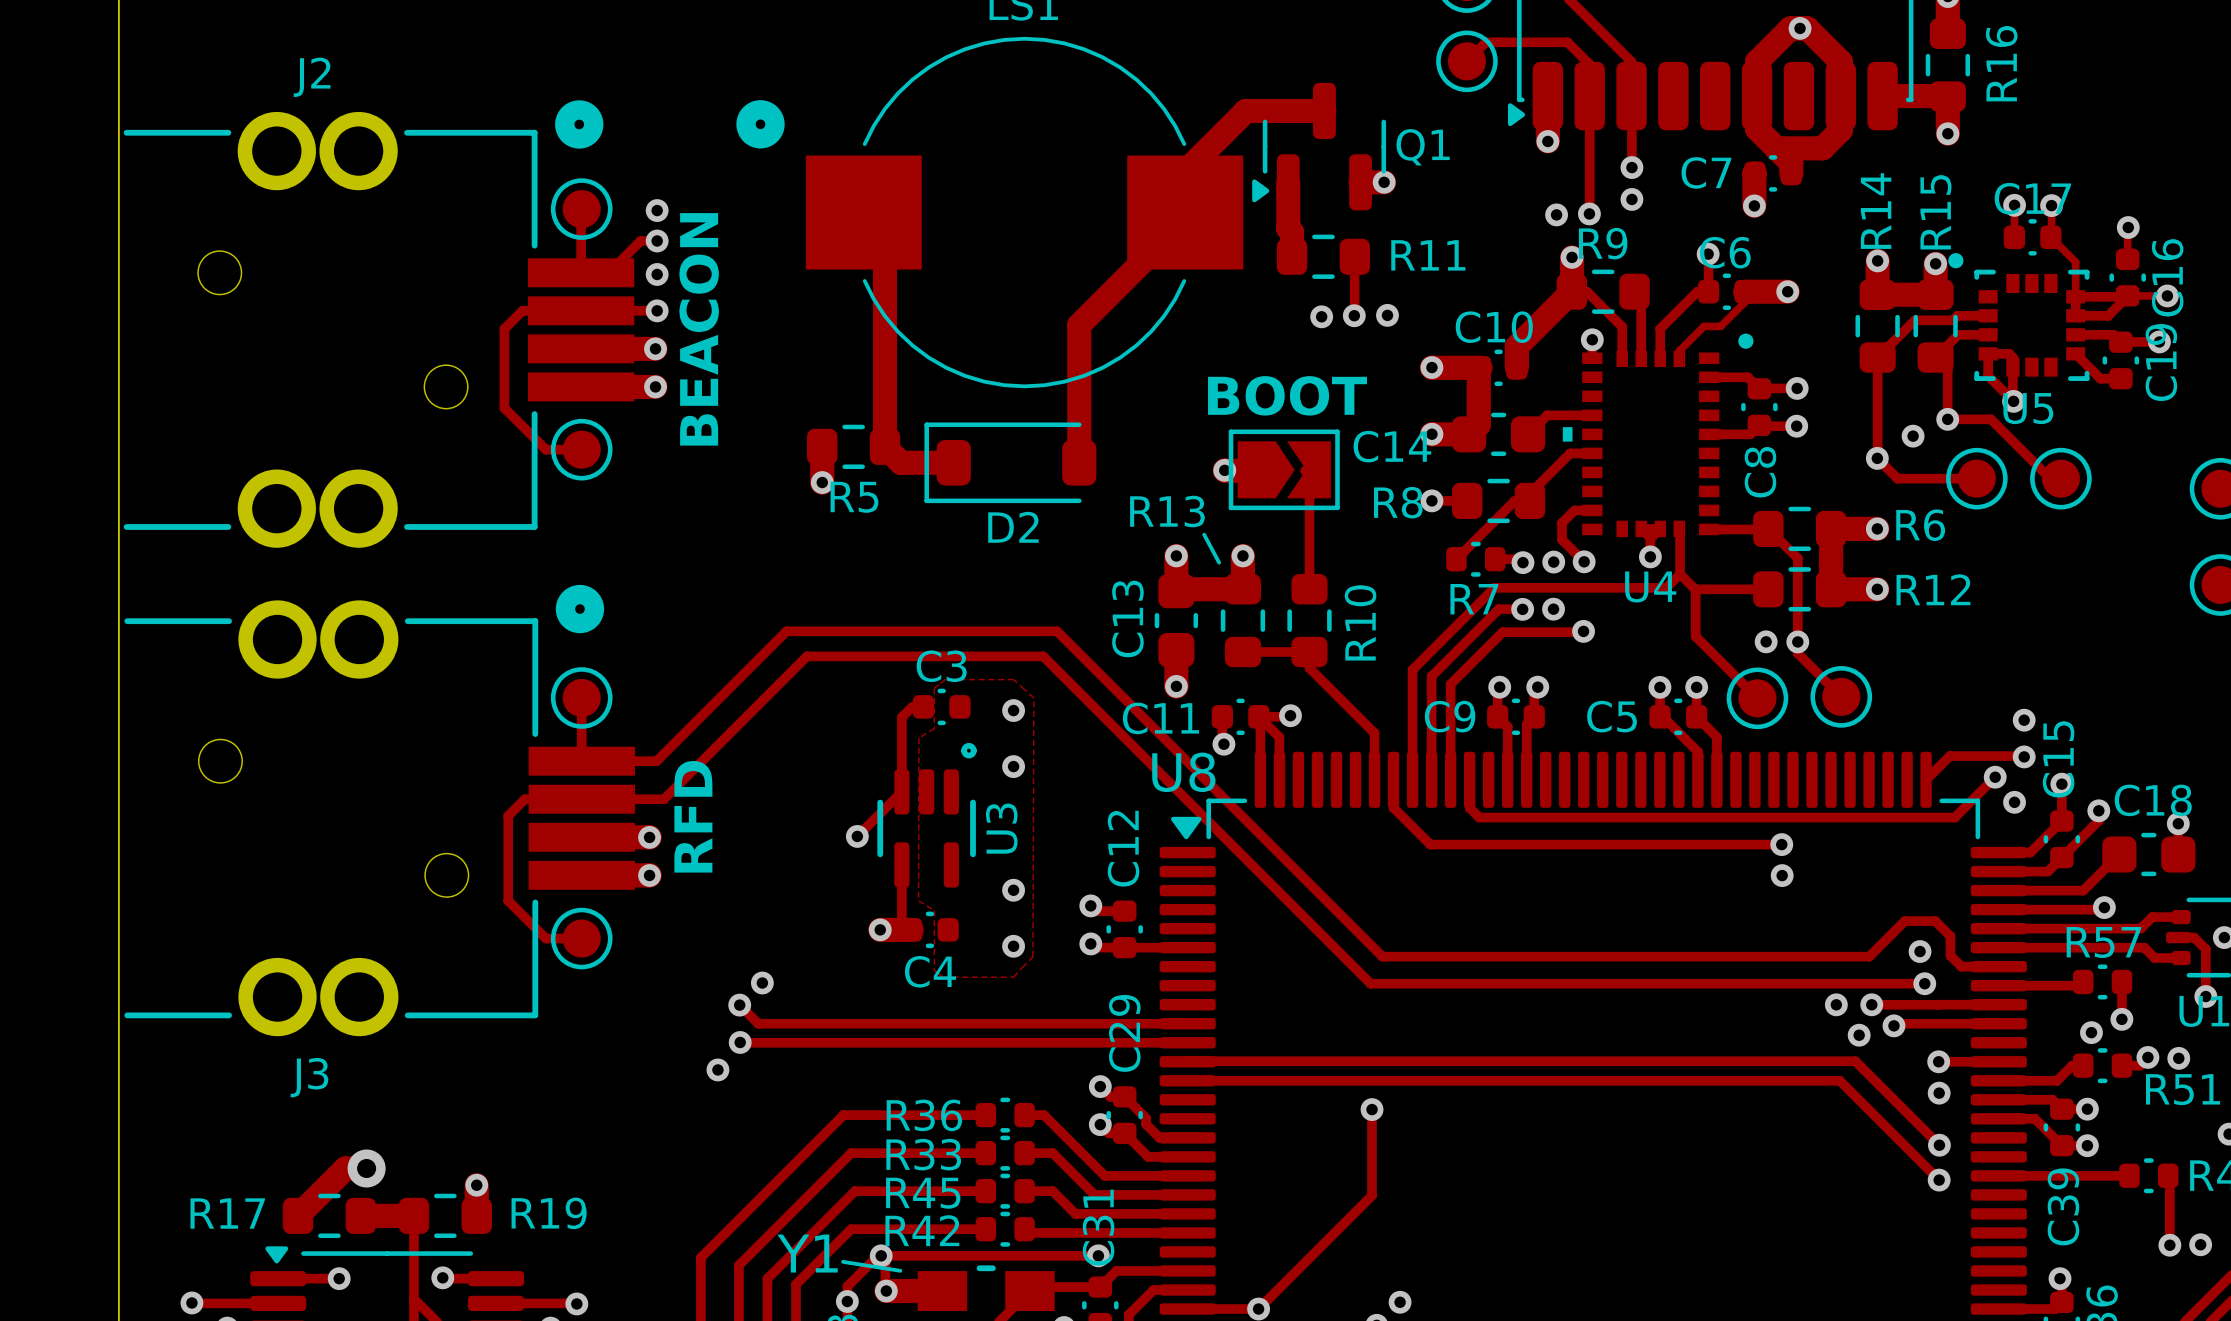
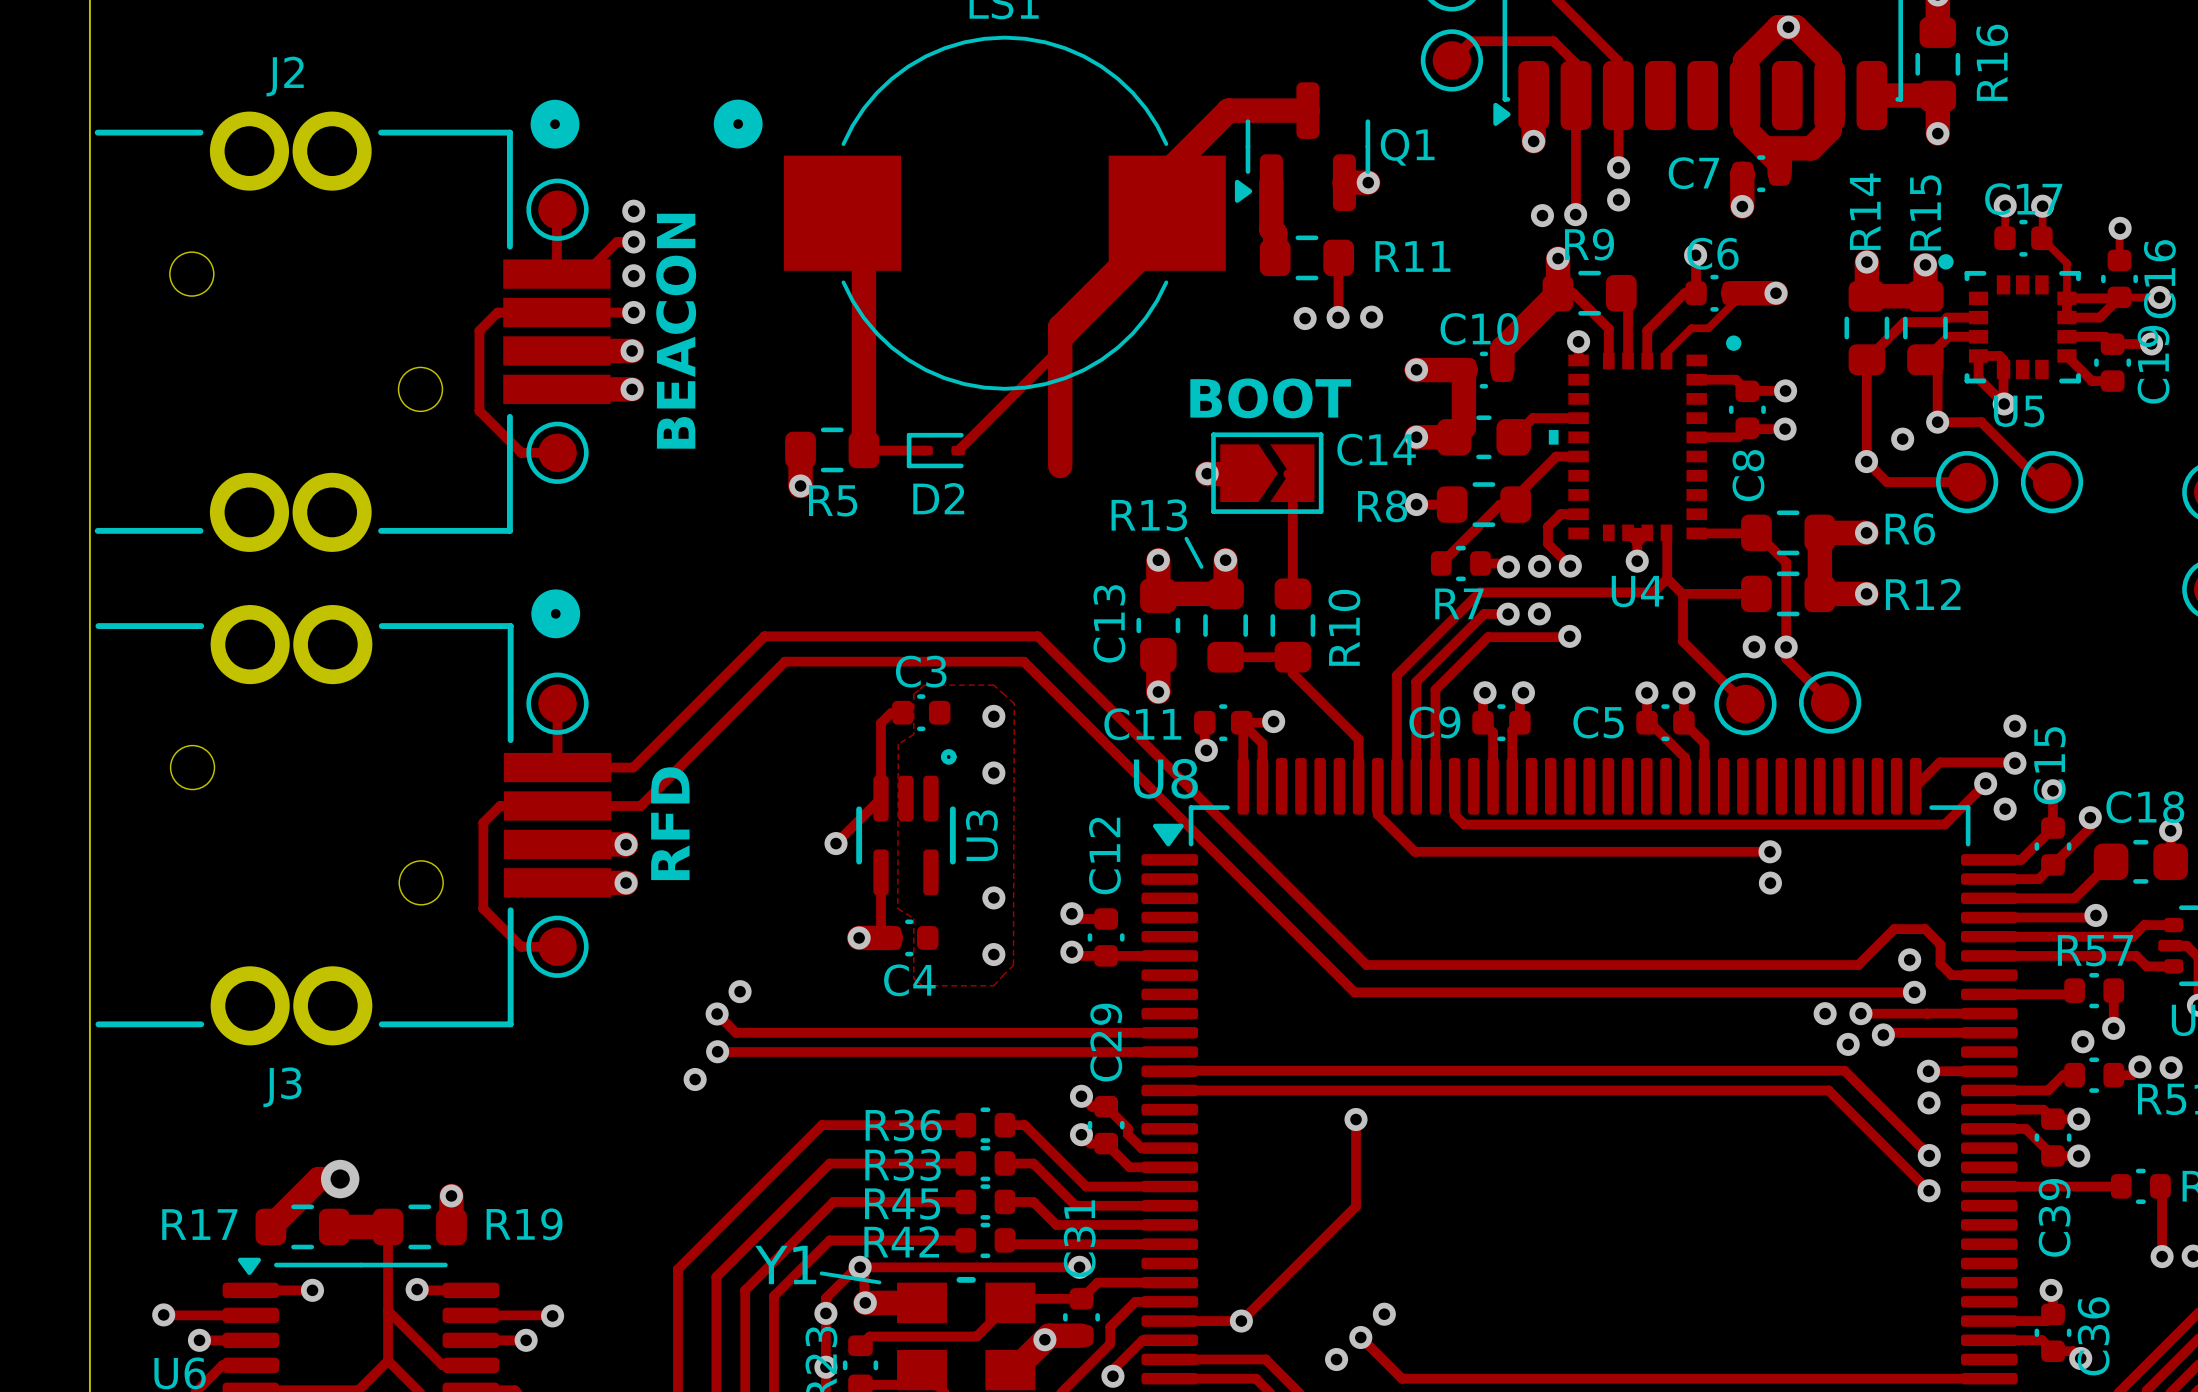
track: none -> (1167, 213) (1167, 241) (958, 450)
D2 footprint: [924, 422, 1097, 504] -> [906, 432, 966, 469]
track: (885, 447) (900, 462) (953, 462) -> (863, 449) (926, 450)

